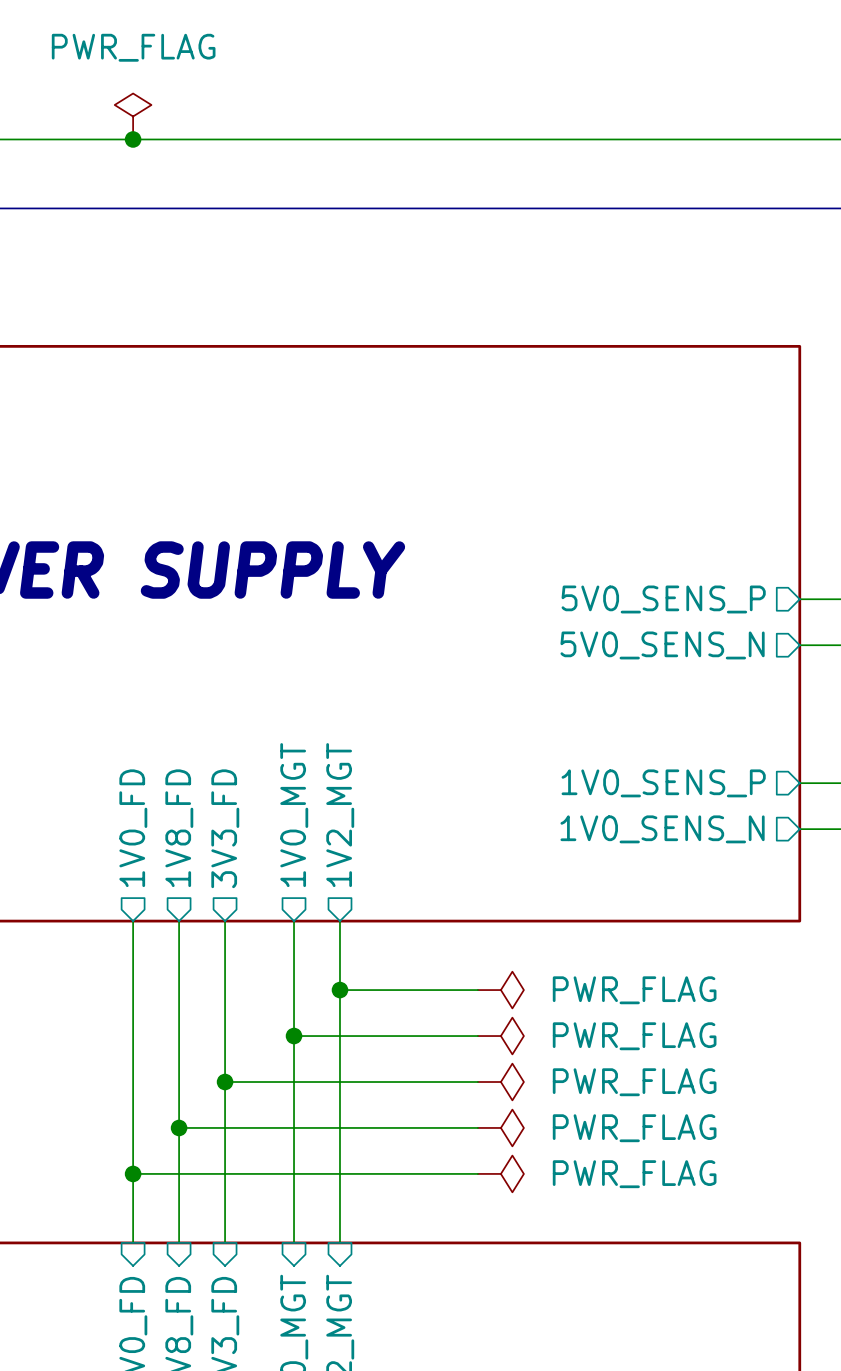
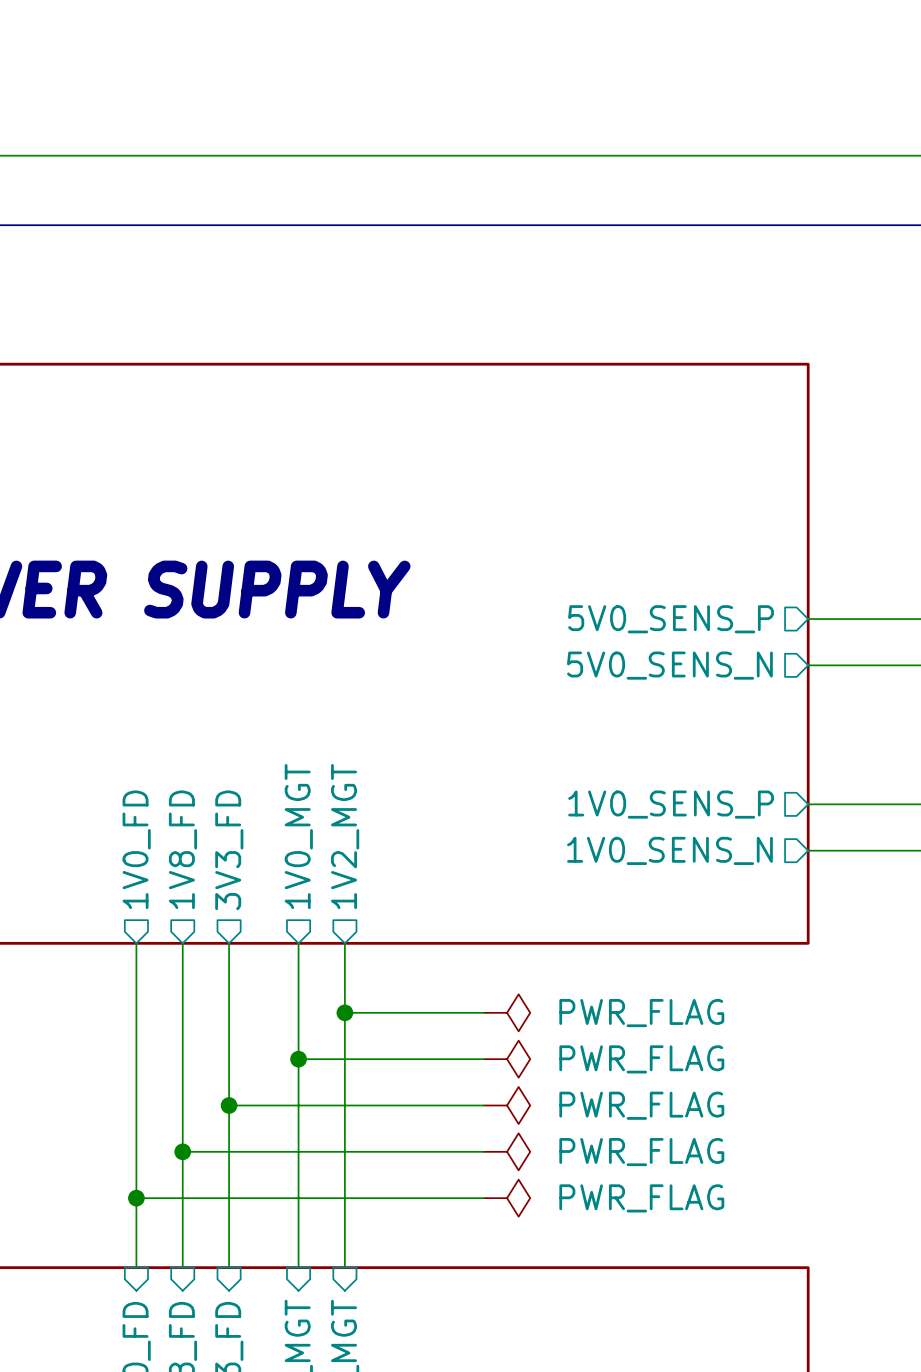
power symbol: PWR_FLAG (133, 116) -> none
junction: (133, 139) -> none

